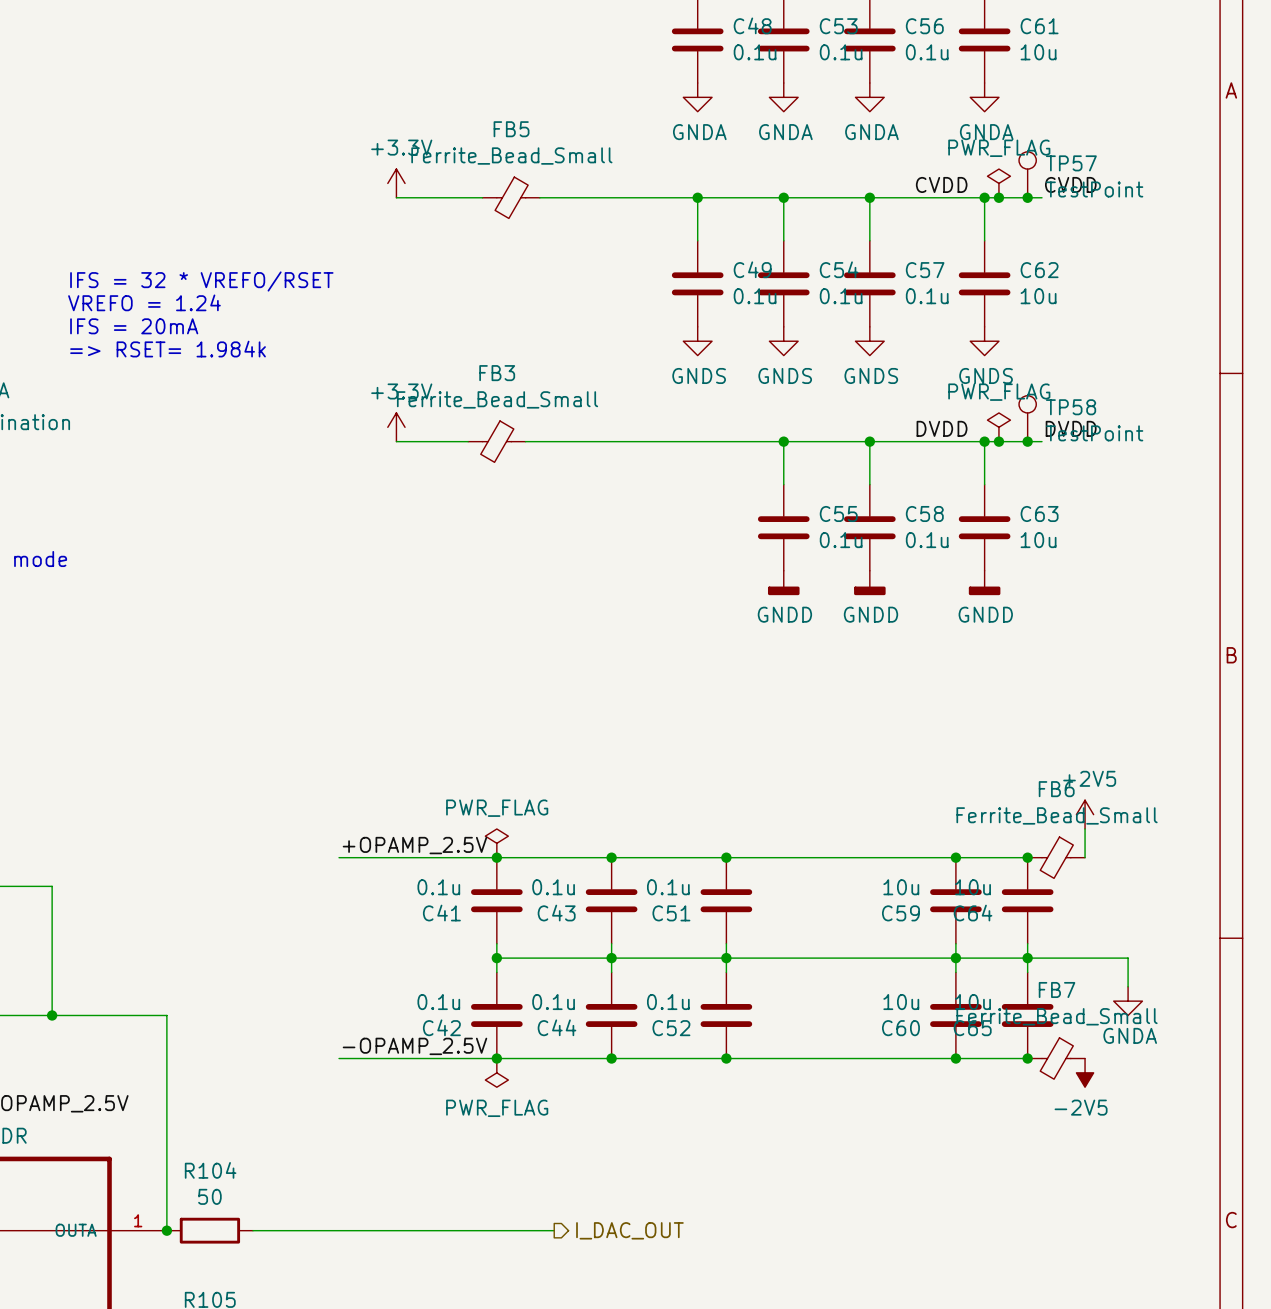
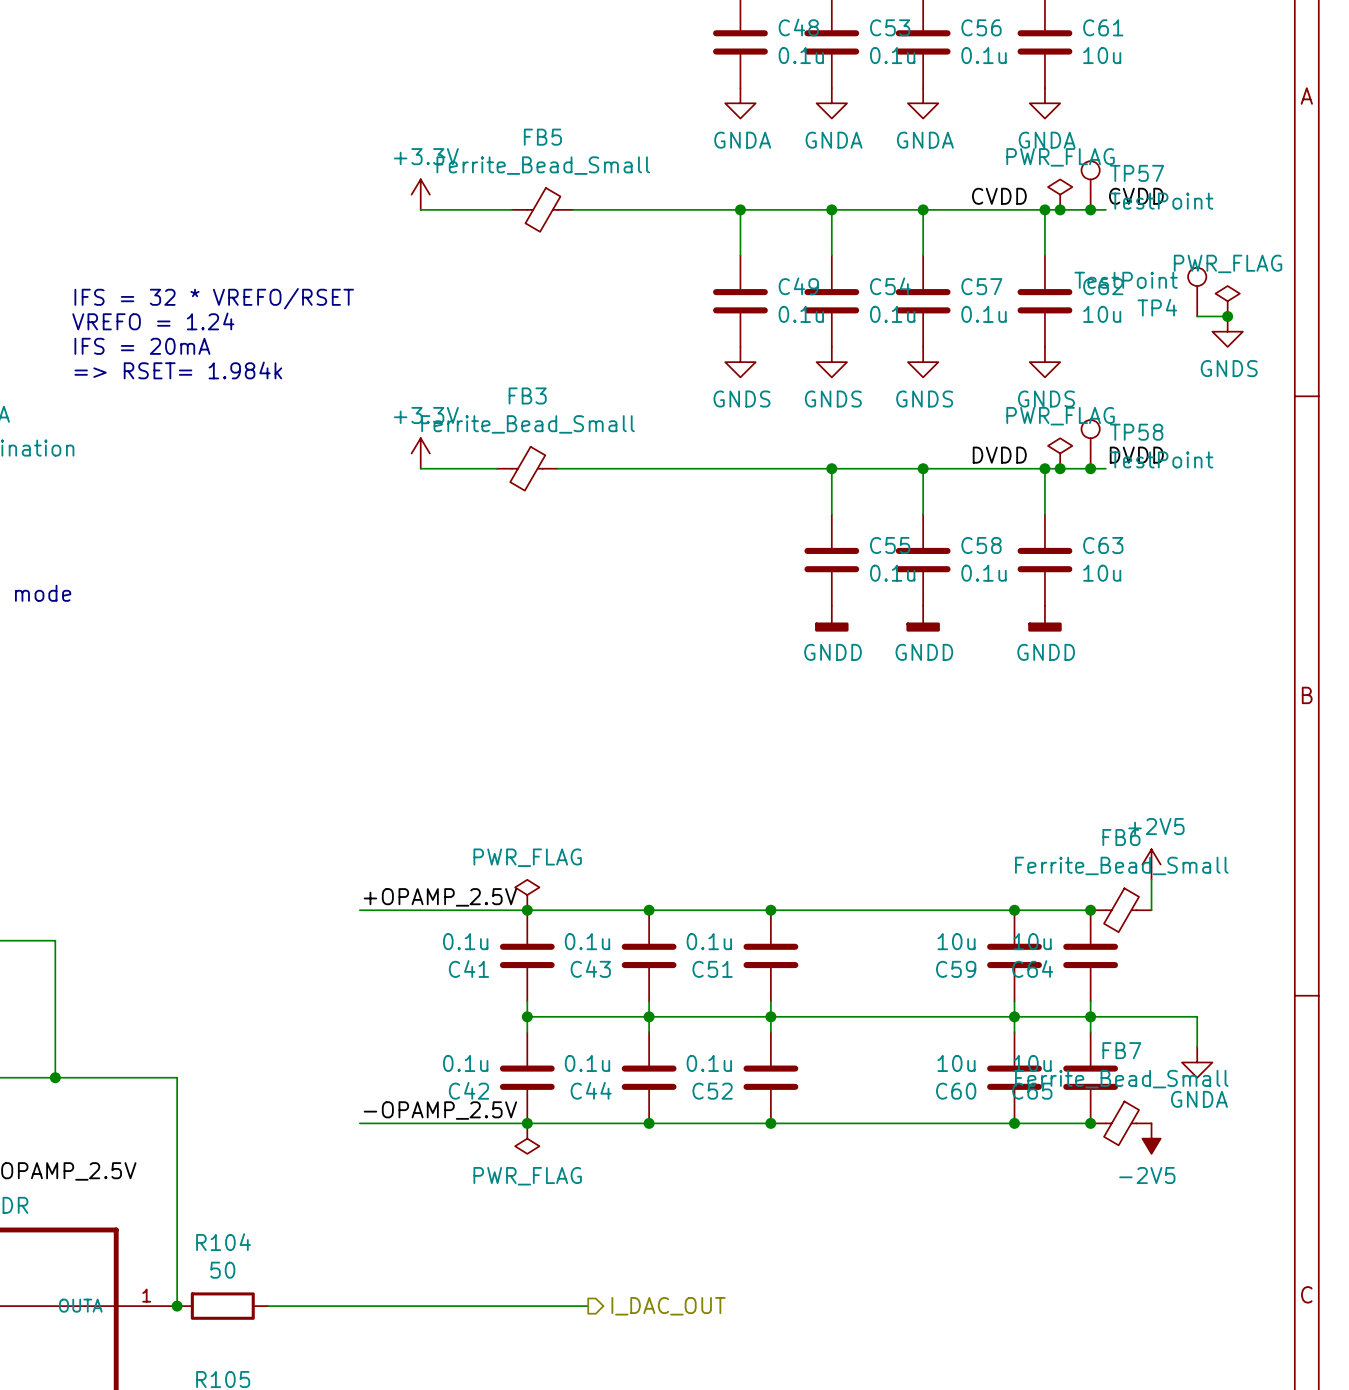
TP4: none -> TestPoint (1197, 292)
power symbol: none -> PWR_FLAG (1227, 301)
wire: none -> (1197, 316) (1227, 316)
junction: none -> (1227, 316)
power symbol: none -> GNDS (1227, 331)

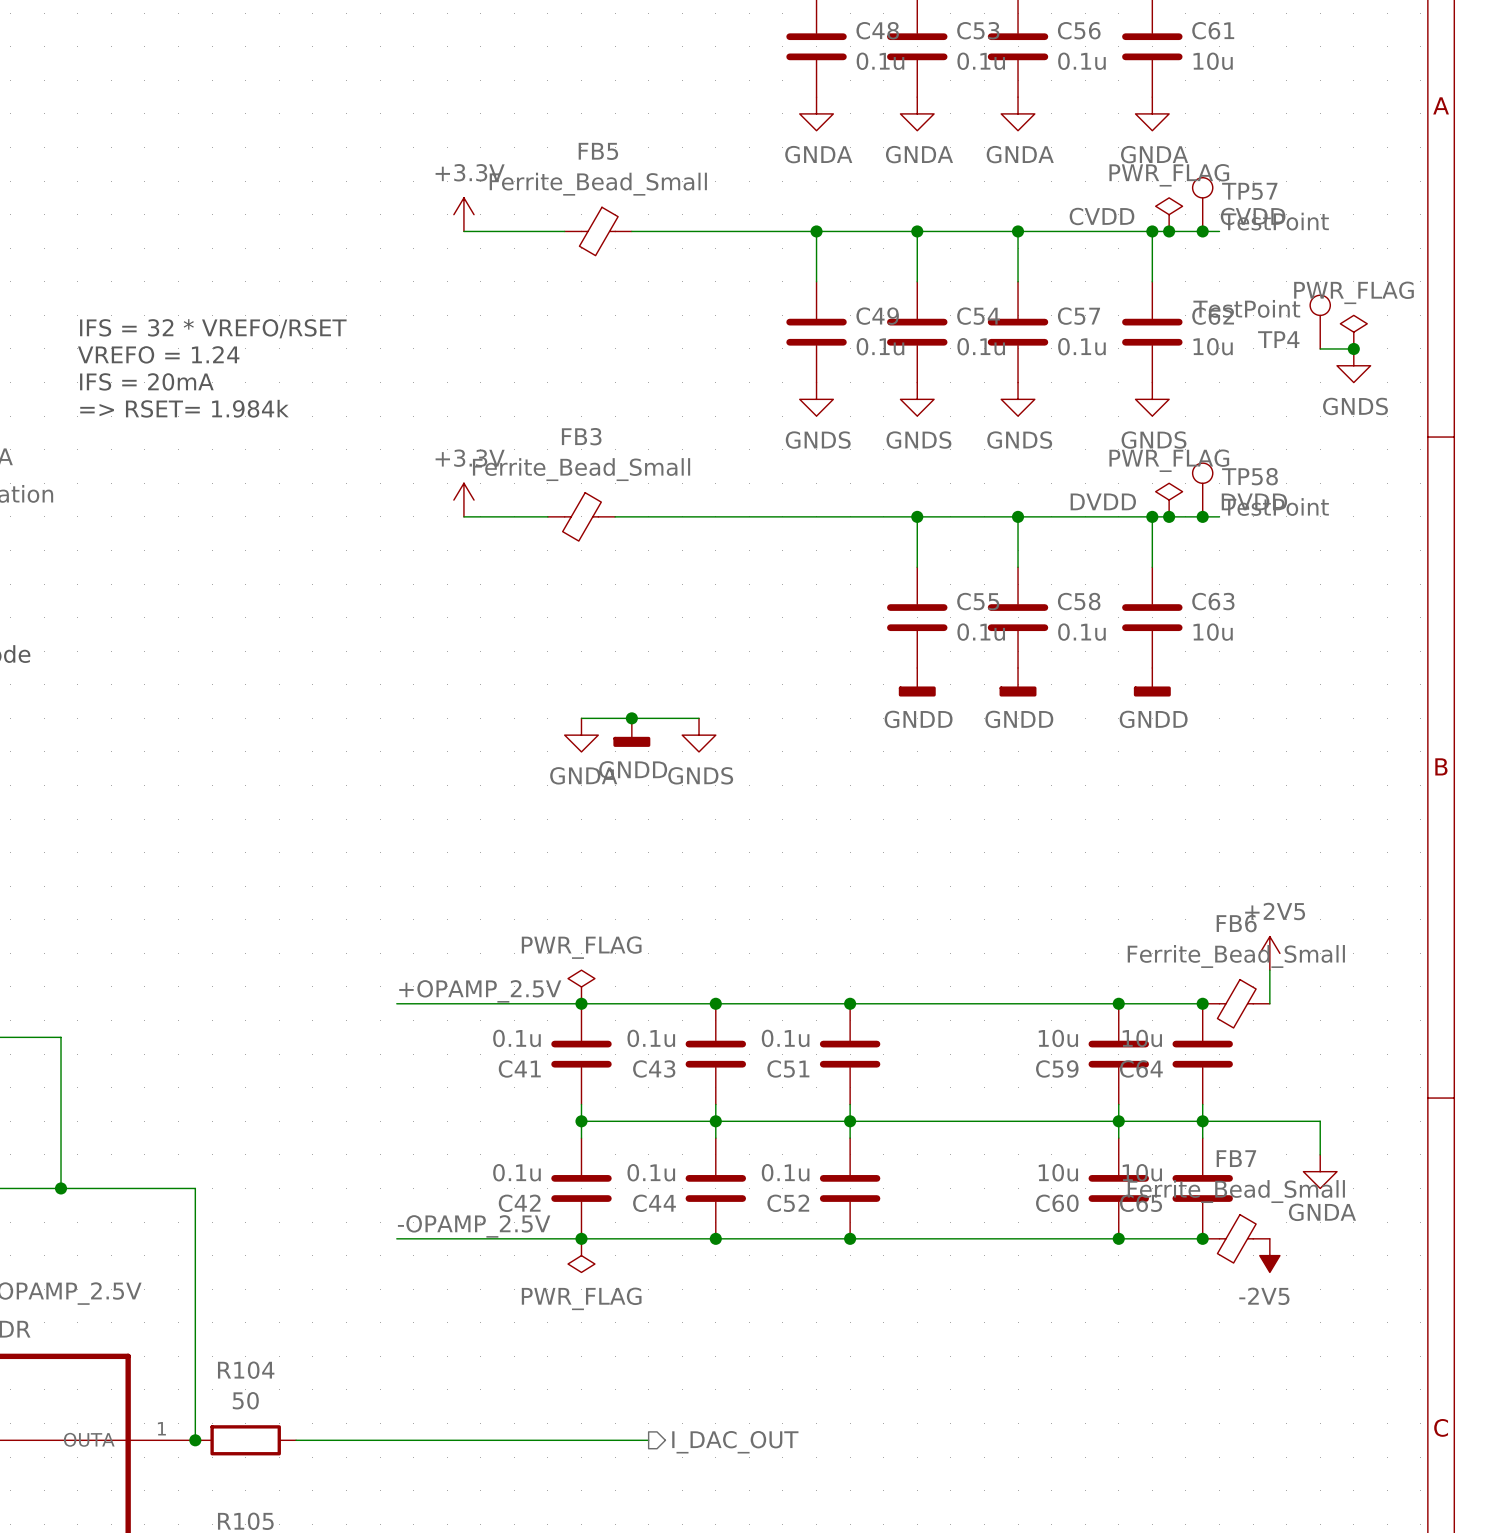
wire: none -> (581, 718) (699, 718)
junction: none -> (631, 718)
power symbol: none -> GNDD (631, 732)
power symbol: none -> GNDA (581, 735)
power symbol: none -> GNDS (699, 735)

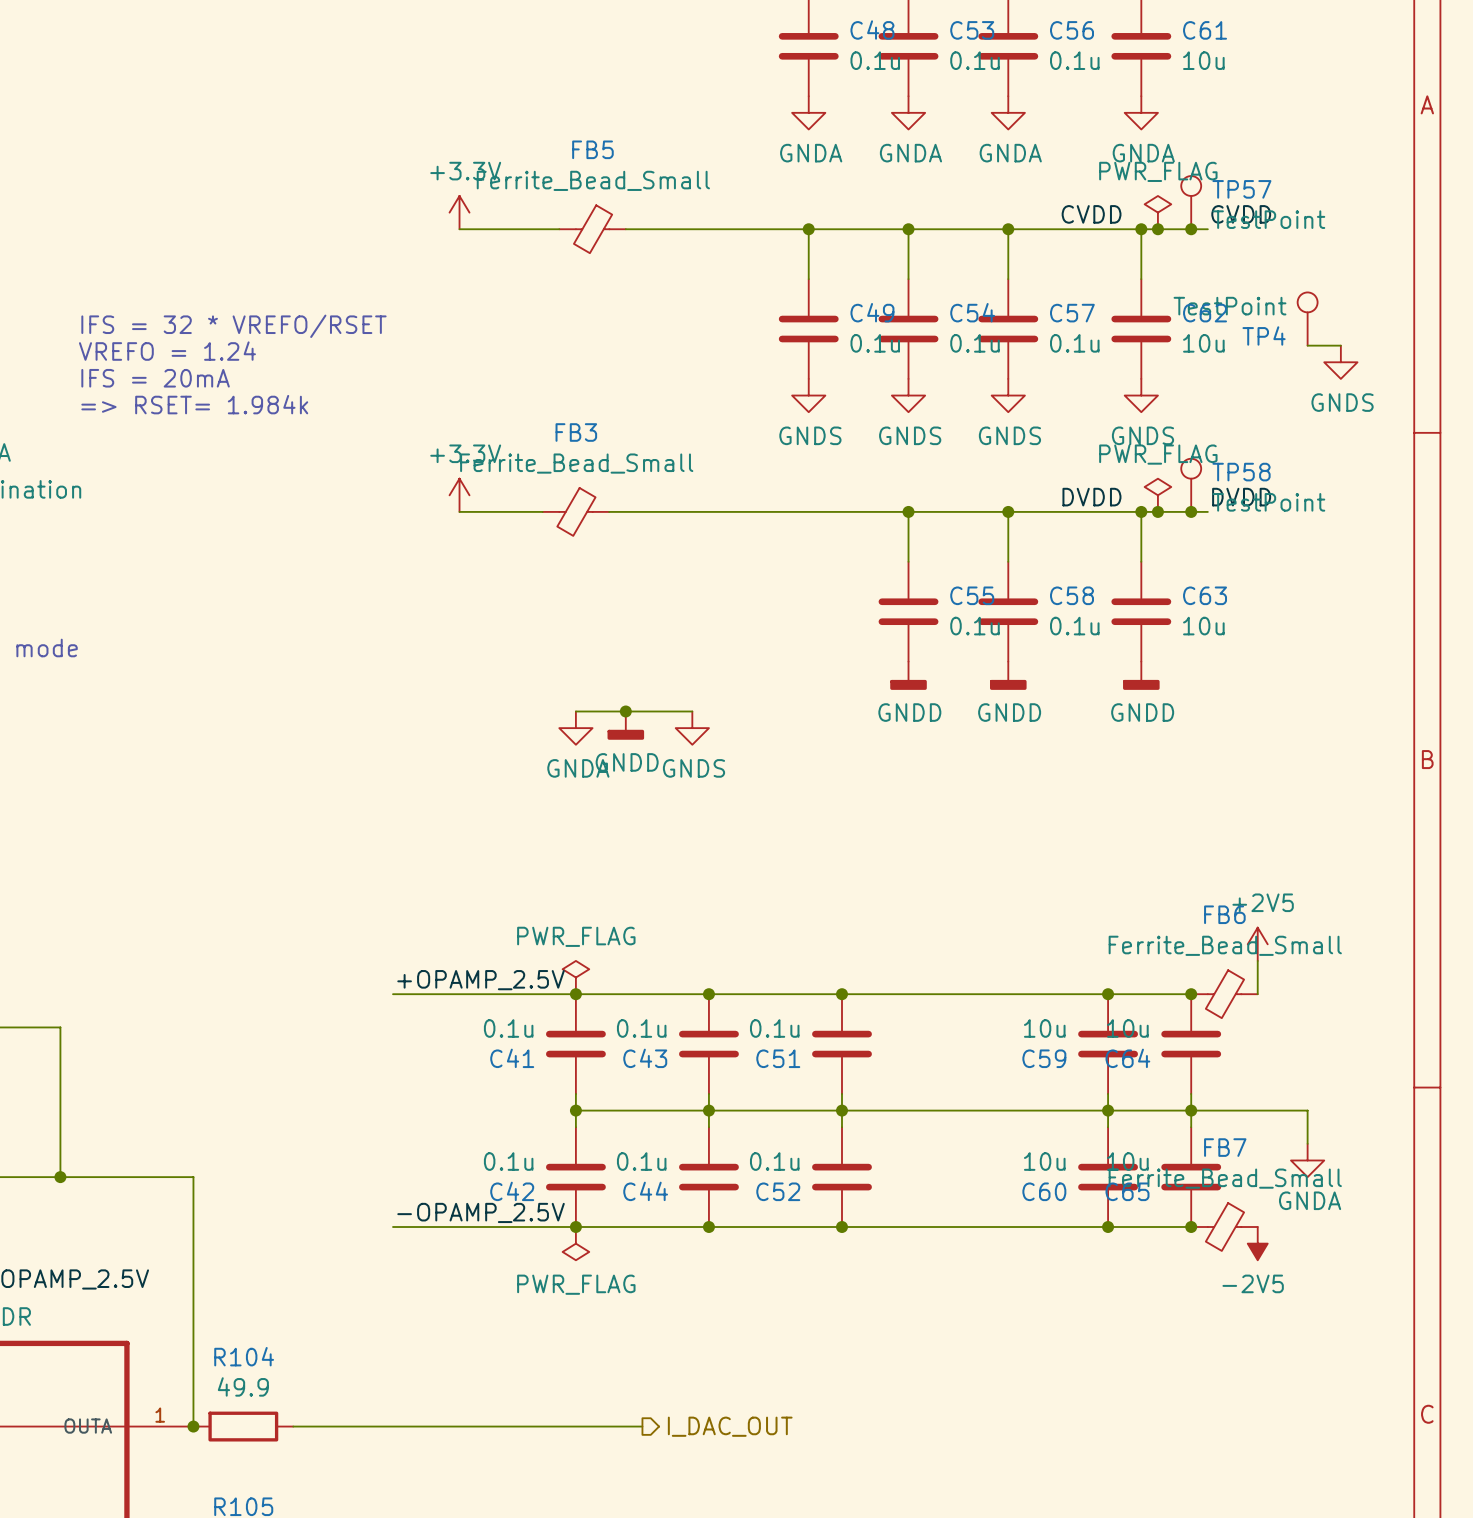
power symbol: PWR_FLAG (1353, 332) -> none
junction: (1353, 348) -> none
R104 value: 50 (245, 1400) -> 49.9 (243, 1386)

